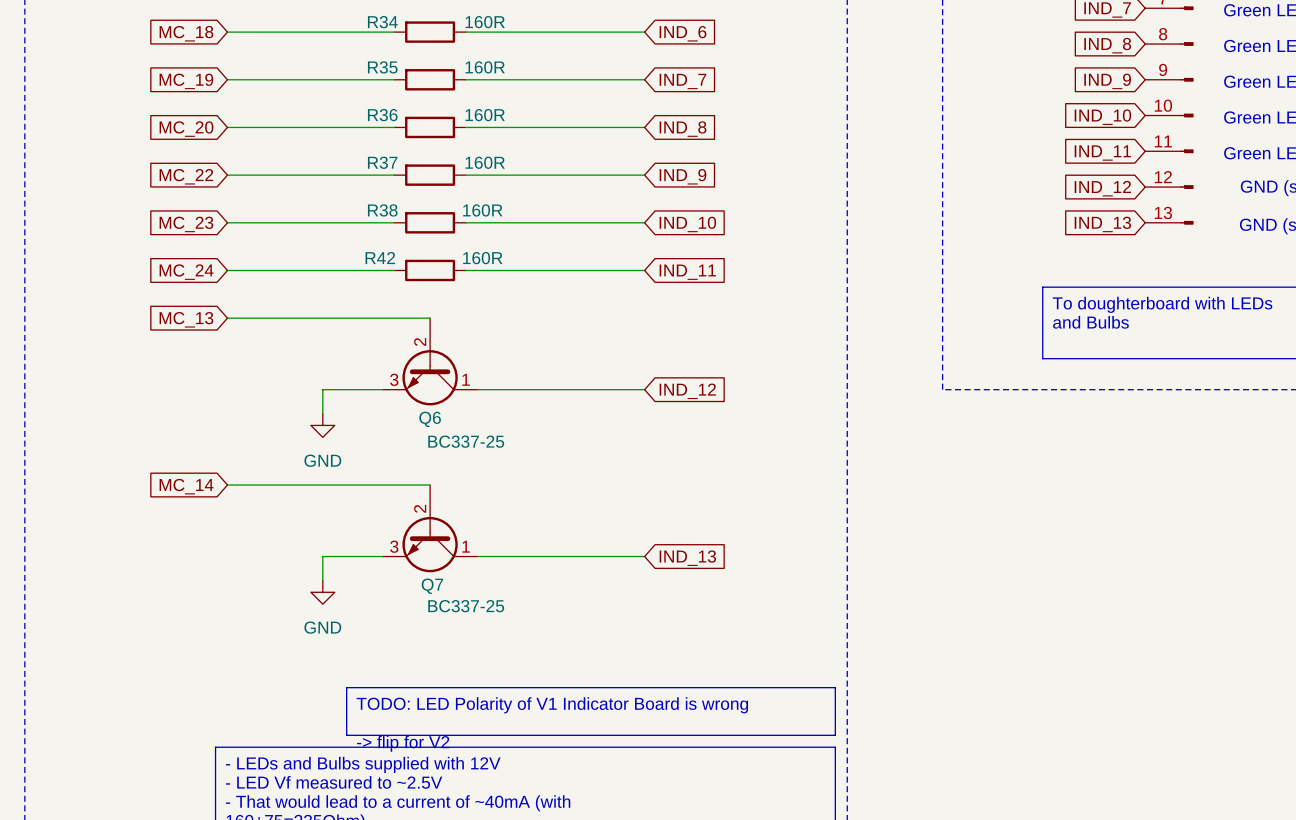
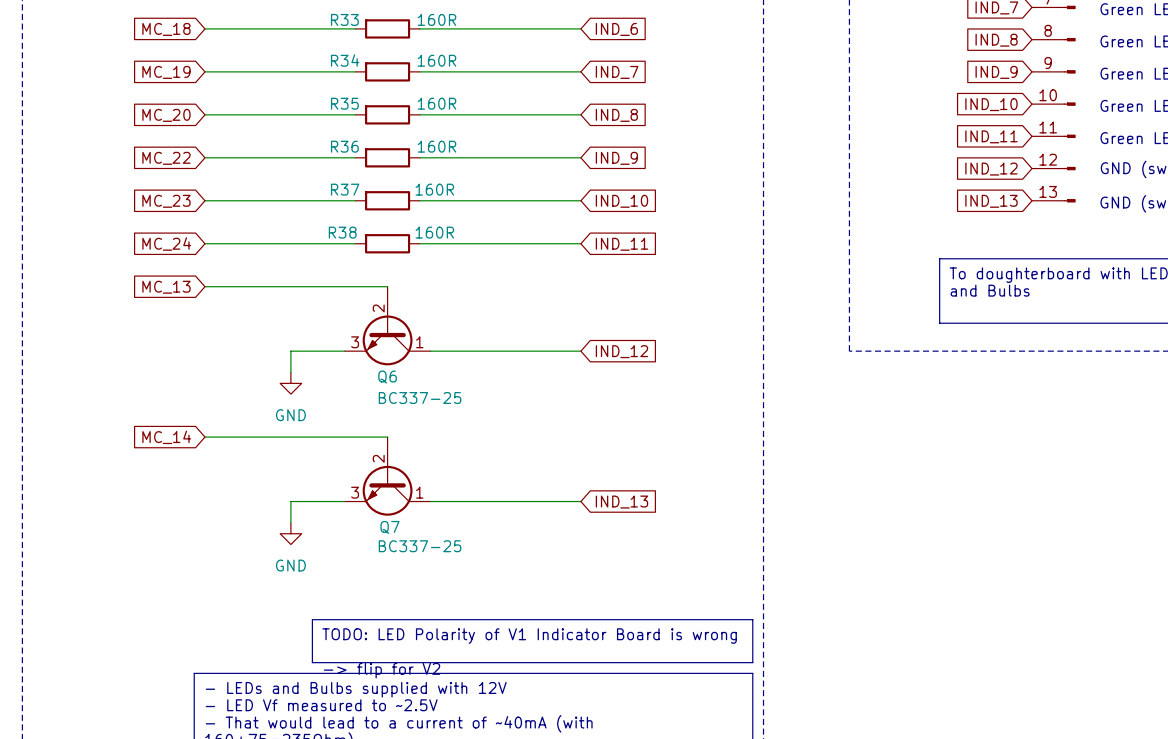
R34 name: R34 (382, 22) -> R33 (344, 19)
R35 name: R35 (382, 67) -> R34 (345, 60)
R36 name: R36 (382, 115) -> R35 (344, 103)
R37 name: R37 (382, 162) -> R36 (344, 146)
R38 name: R38 (382, 210) -> R37 (345, 189)
R42 name: R42 (380, 258) -> R38 (342, 232)

